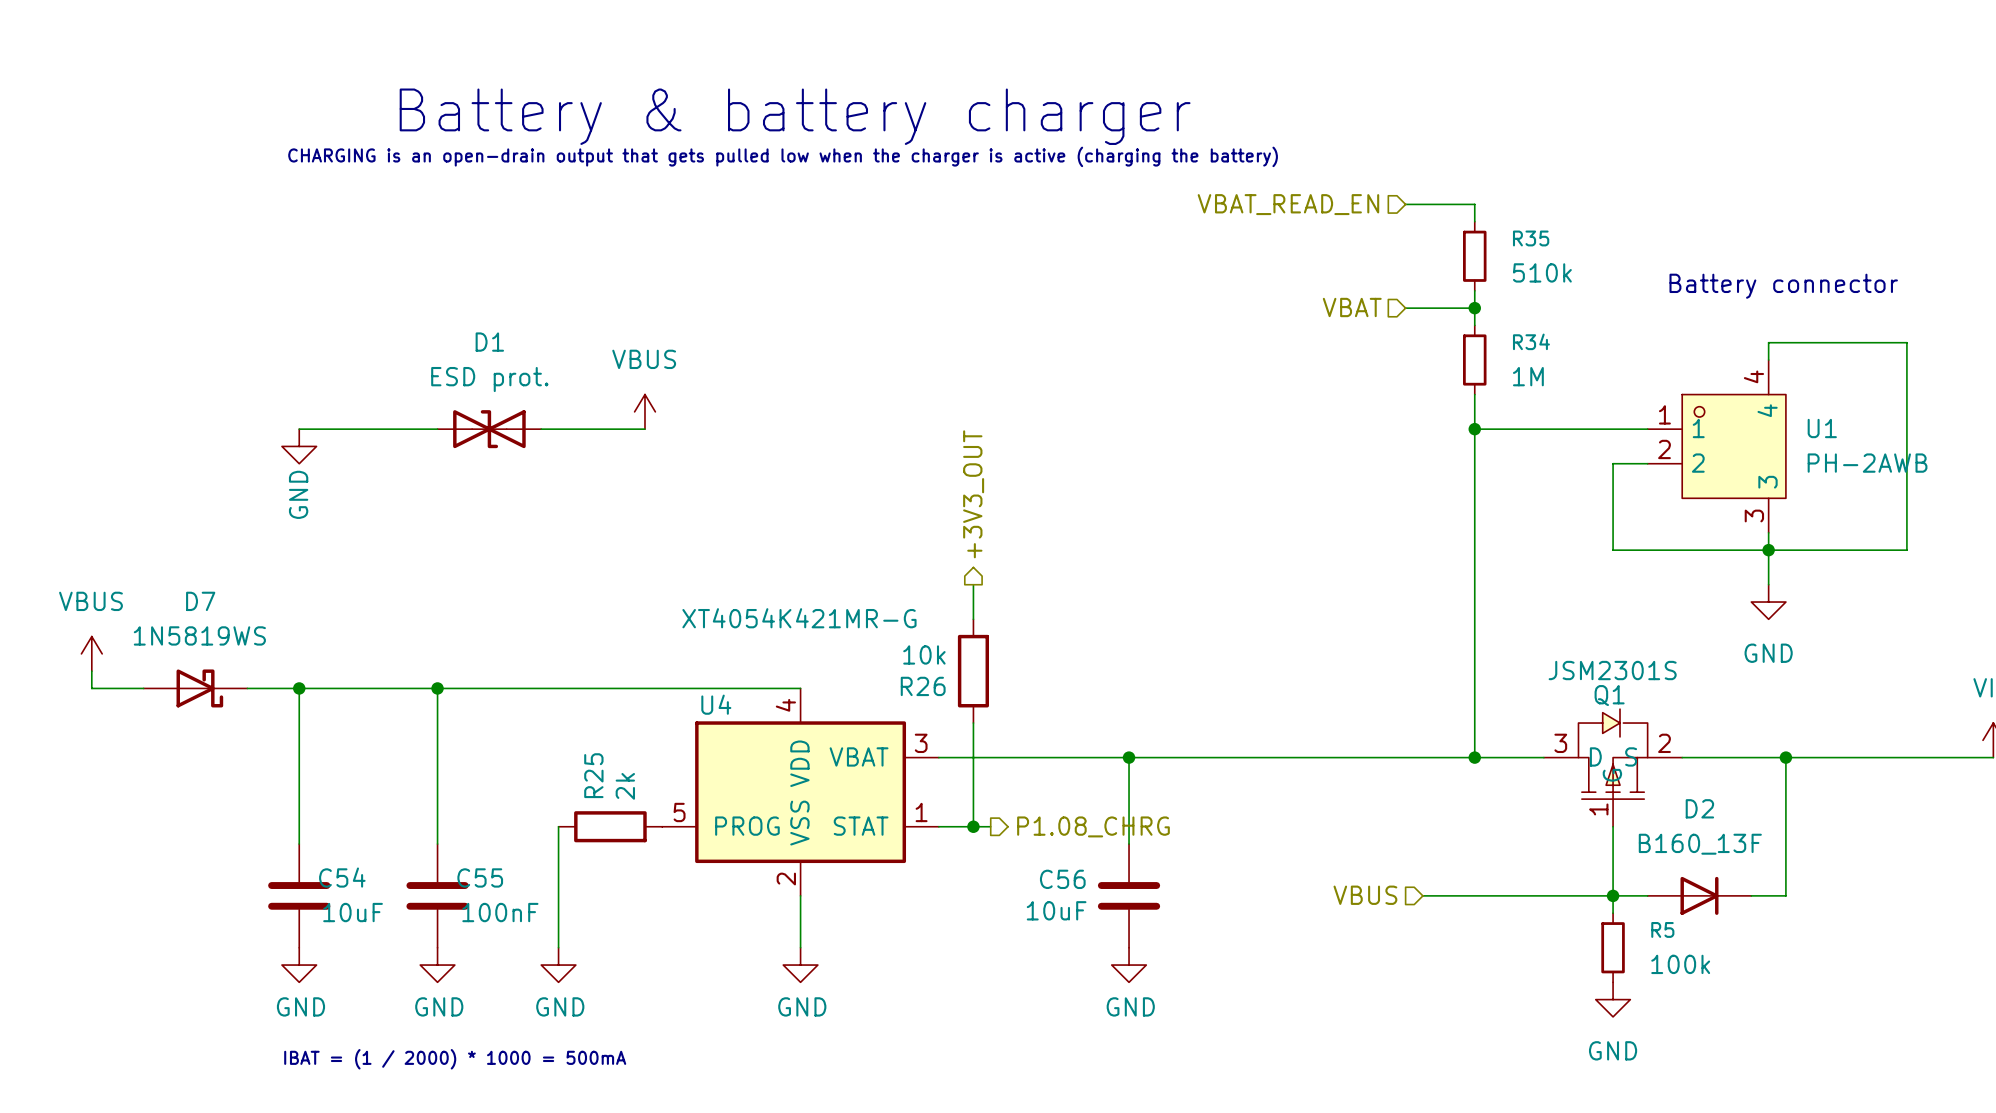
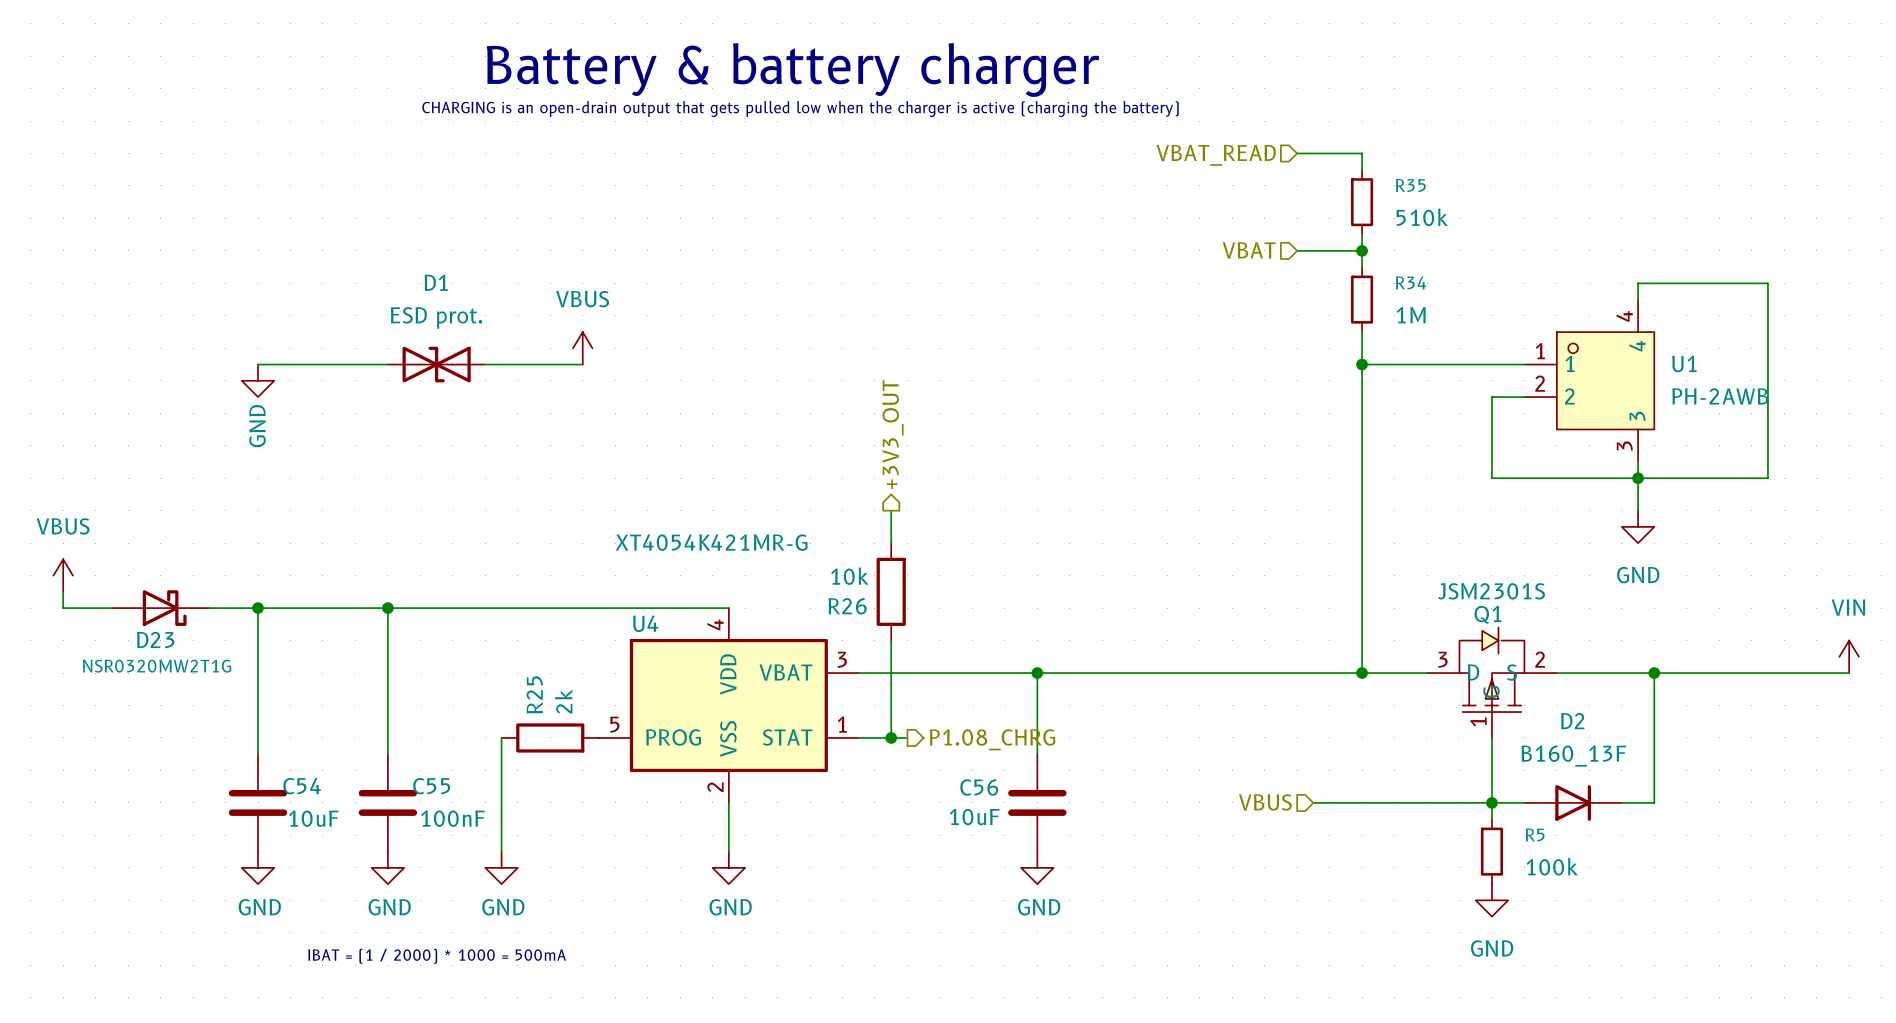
hierarchical label: VBAT_READ_EN (1288, 204) -> VBAT_READ (1216, 155)
text: Battery connector (1783, 286) -> none
D7 name: D7 (200, 601) -> D23 (155, 639)
D7 value: 1N5819WS (199, 635) -> NSR0320MW2T1G (157, 666)

